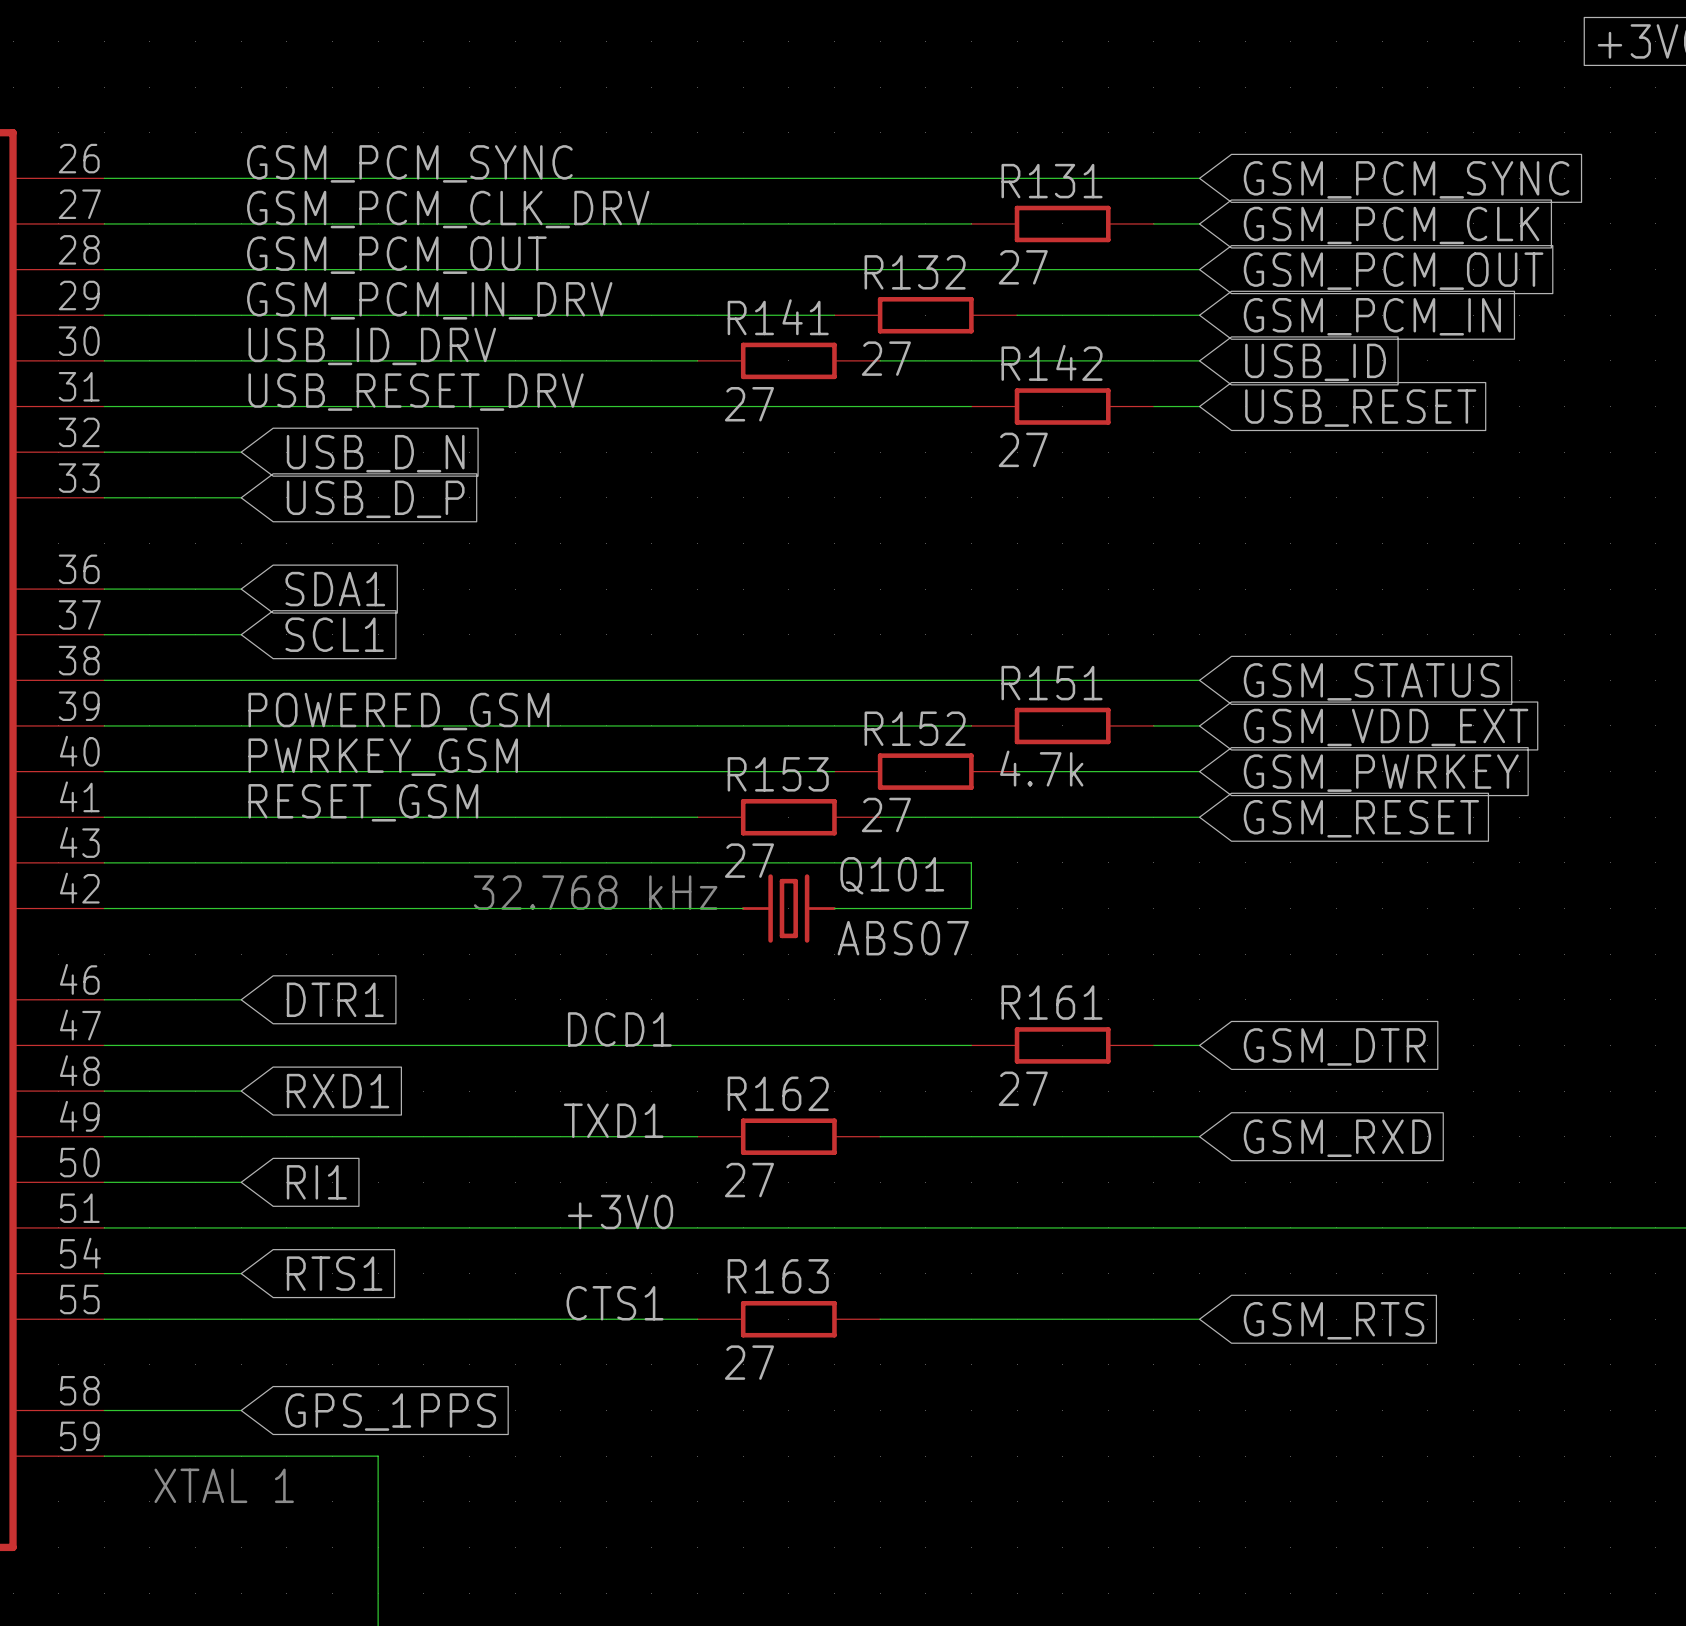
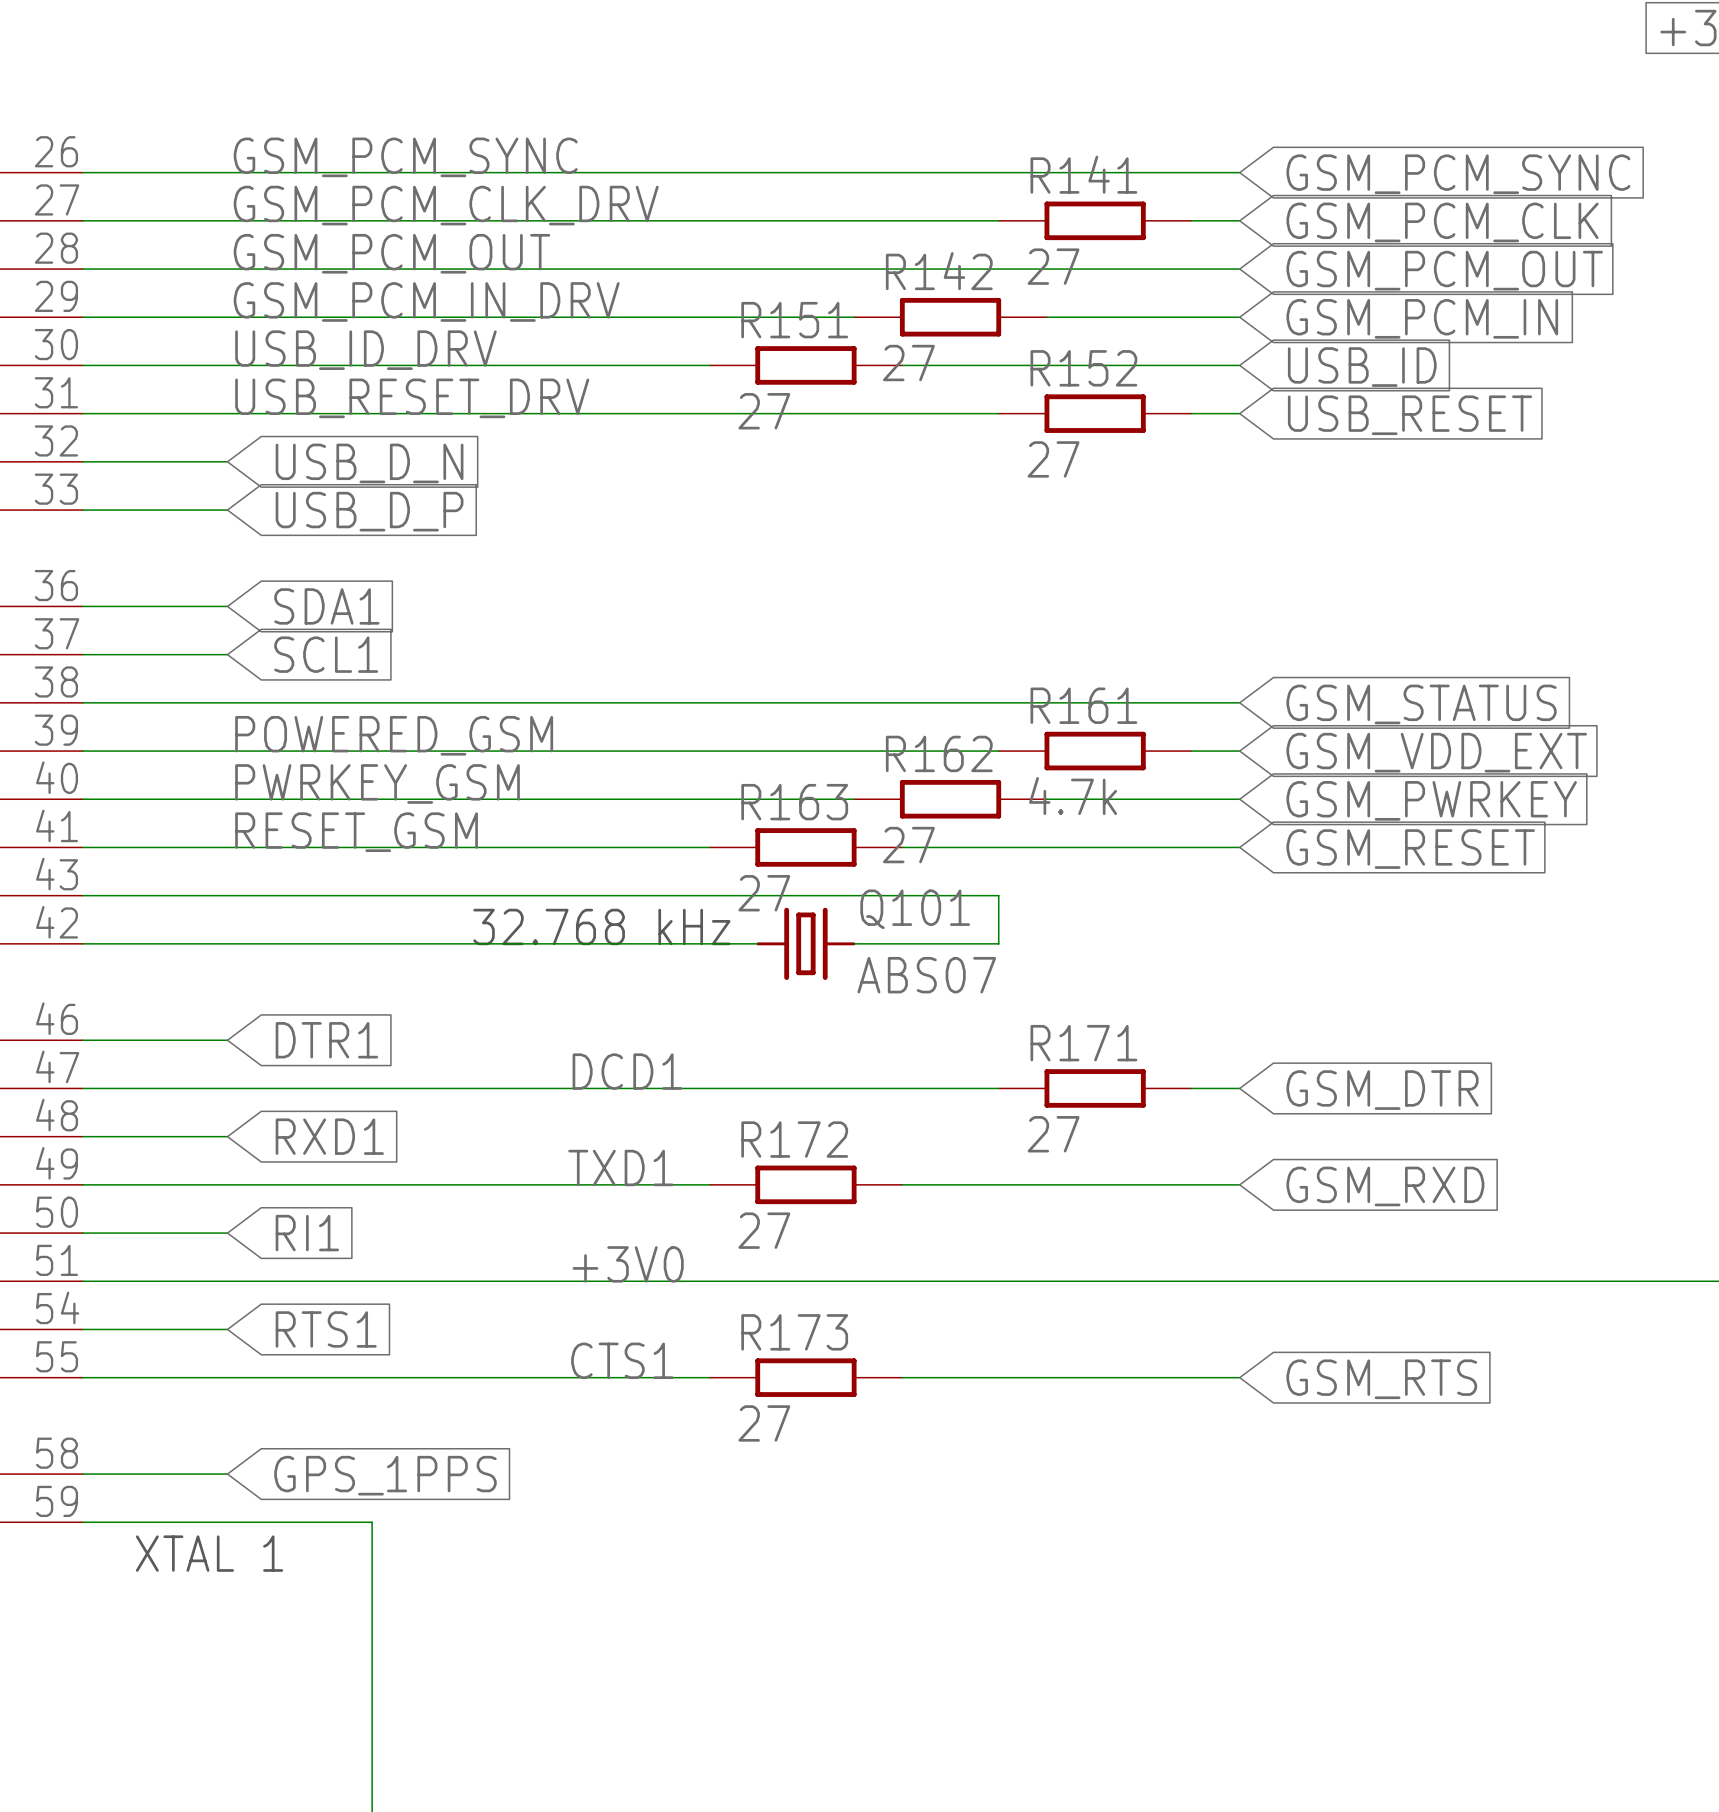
R131 name: R131 (1052, 181) -> R141 (1083, 174)
R132 name: R132 (915, 272) -> R142 (939, 271)
R141 name: R141 (778, 317) -> R151 (794, 320)
R142 name: R142 (1052, 362) -> R152 (1083, 368)
R151 name: R151 (1052, 683) -> R161 (1083, 705)
R152 name: R152 (915, 728) -> R162 (939, 753)
R153 name: R153 (778, 774) -> R163 (794, 802)
R161 name: R161 (1052, 1002) -> R171 (1083, 1043)
R162 name: R162 (778, 1093) -> R172 (794, 1139)
R163 name: R163 (778, 1276) -> R173 (794, 1332)

